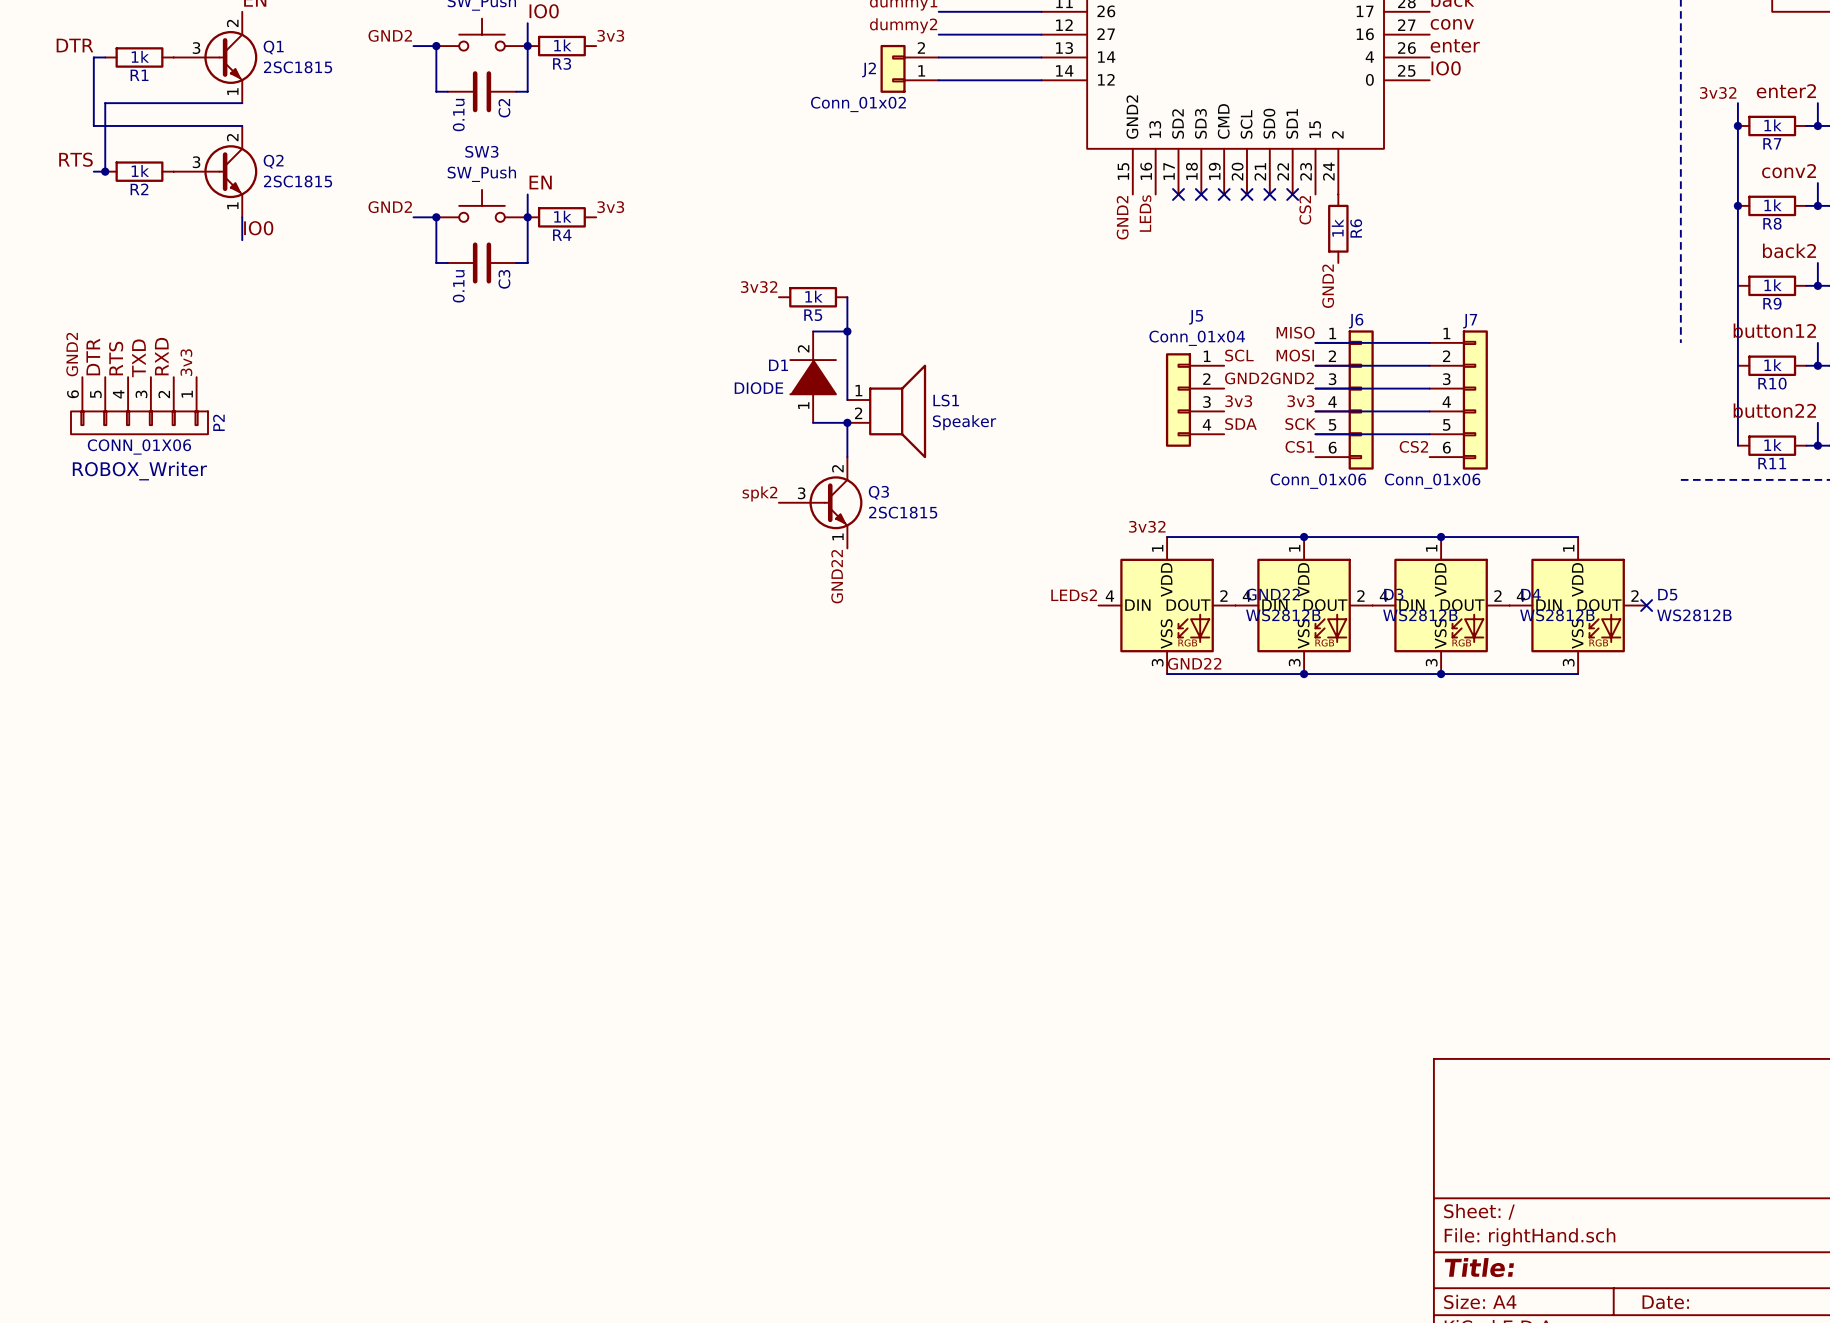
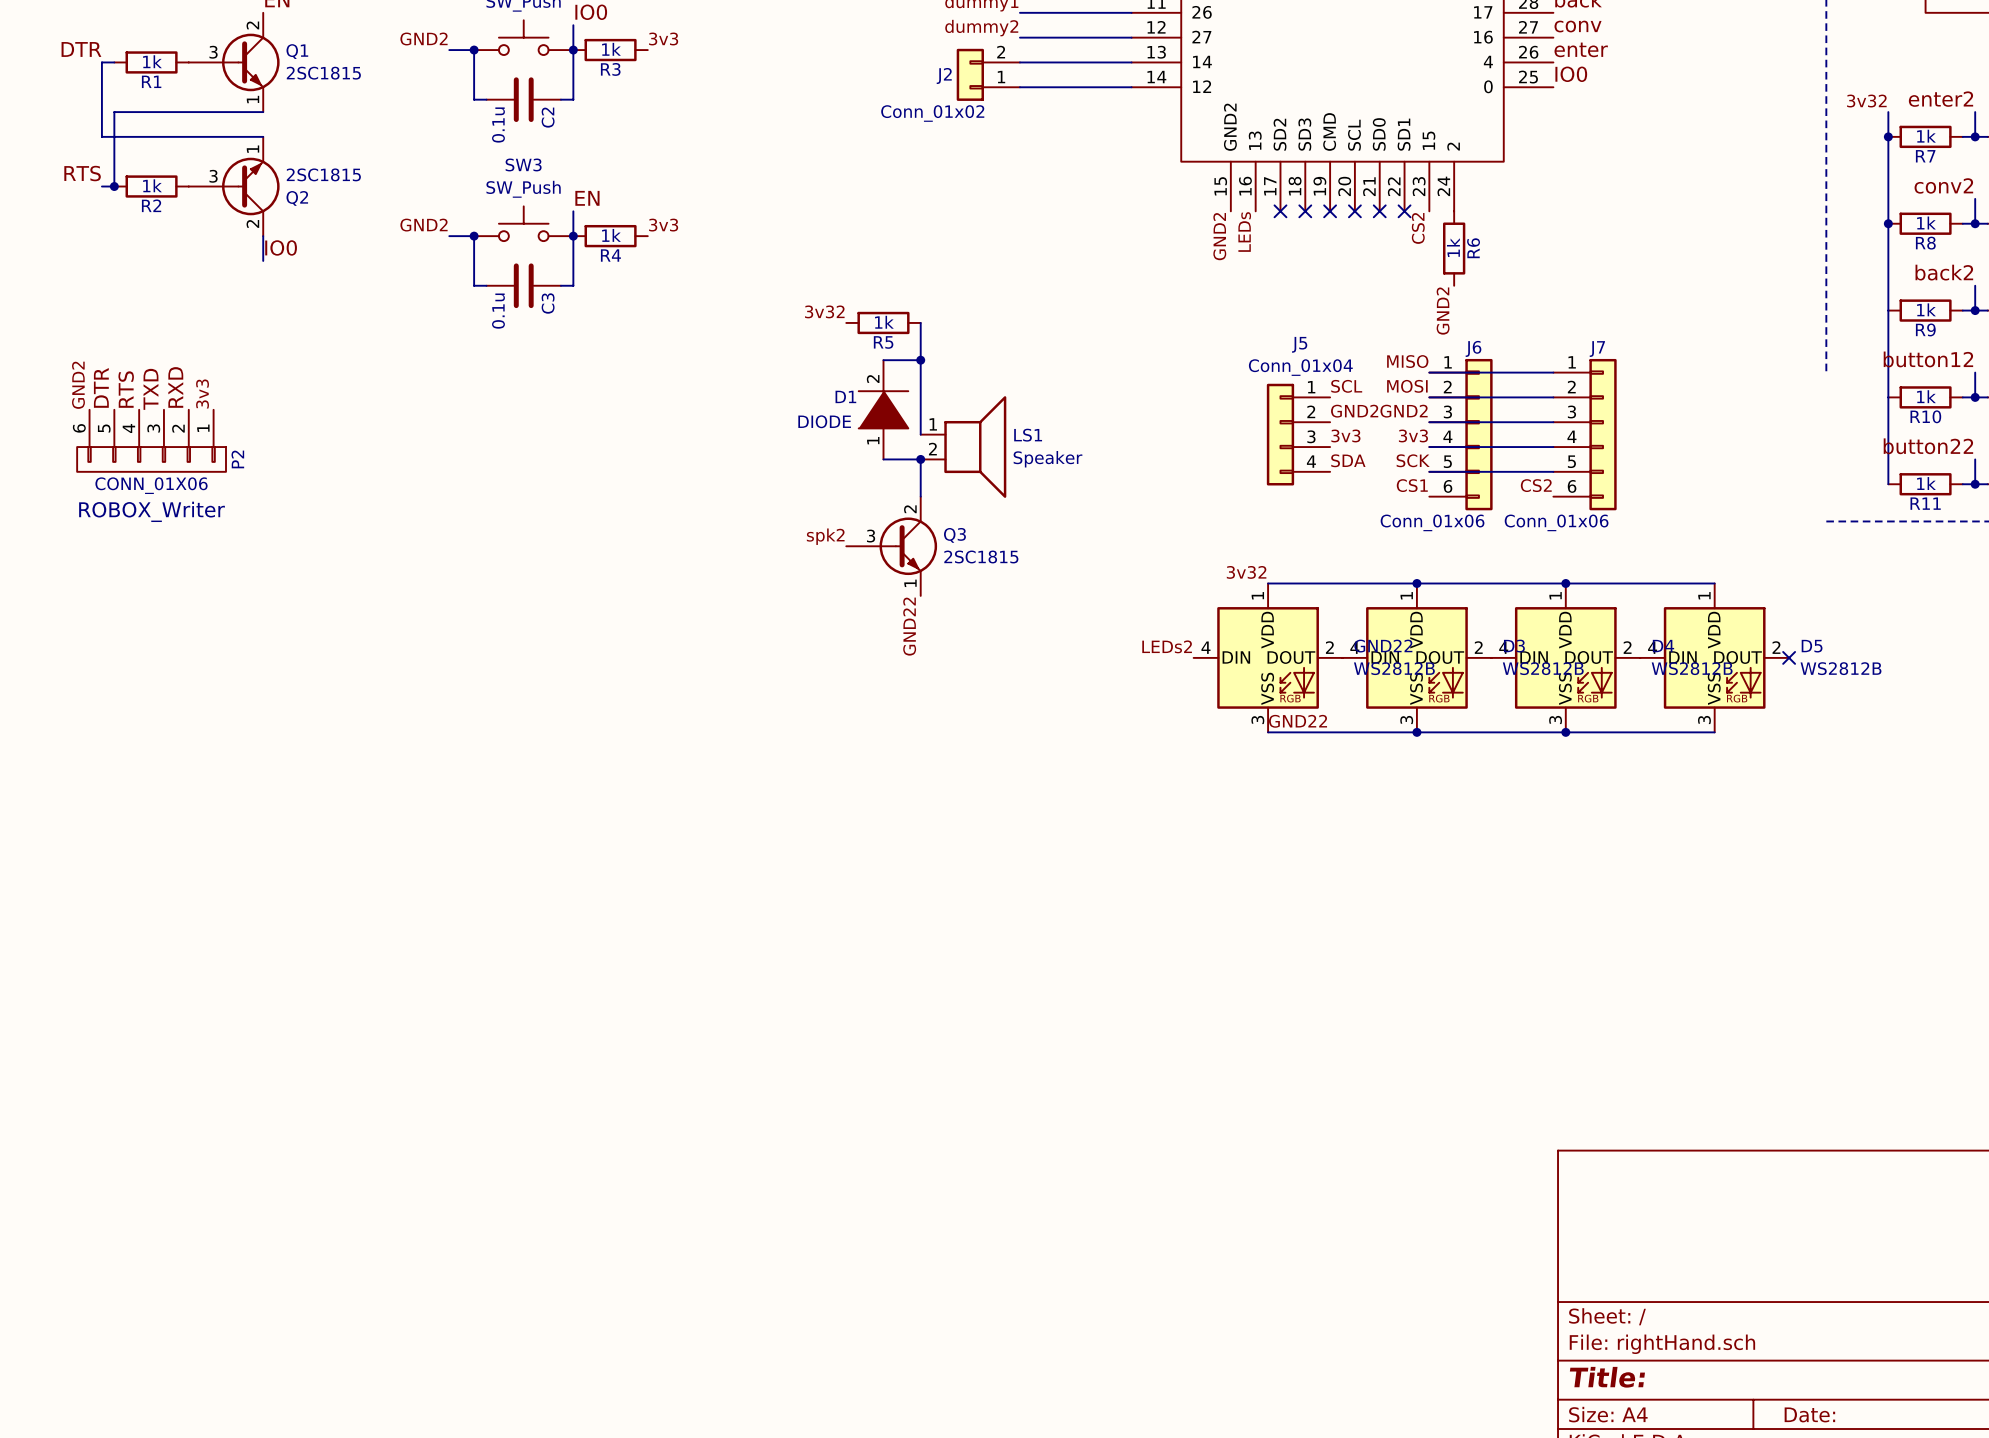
Q2 flip: as is (230, 171) -> up-down (250, 186)

